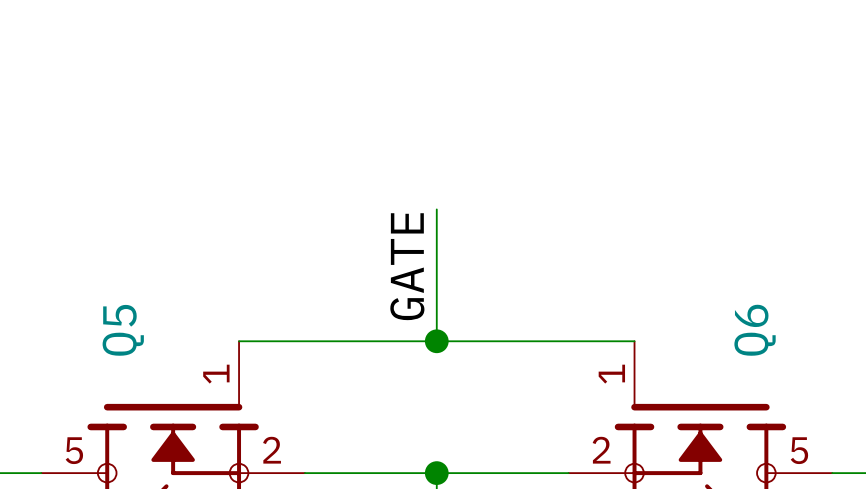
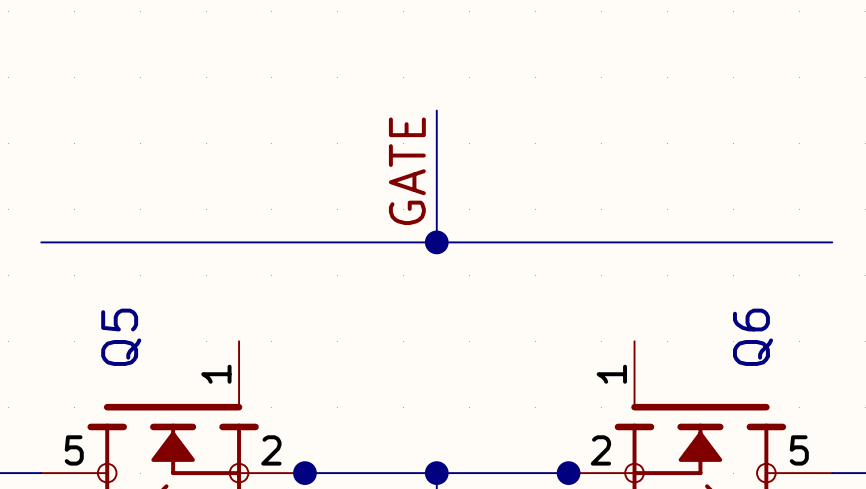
wire: none -> (41, 242) (832, 242)
wire: (436, 242) (436, 341) -> (436, 110) (436, 209)
junction: none -> (436, 242)
label position: GATE (407, 266) -> GATE (407, 171)
wire: (239, 341) (634, 341) -> none
junction: (436, 341) -> none
junction: none -> (304, 473)
junction: none -> (568, 473)

